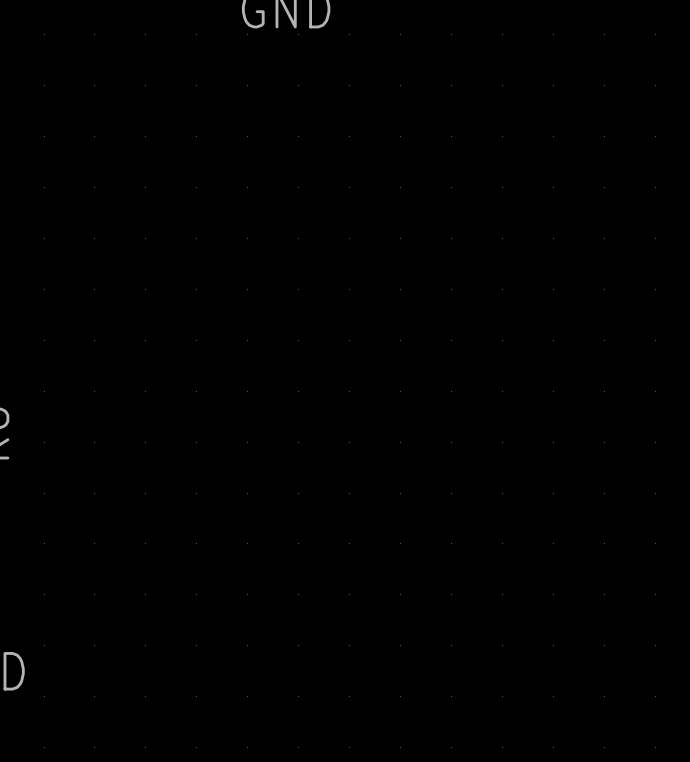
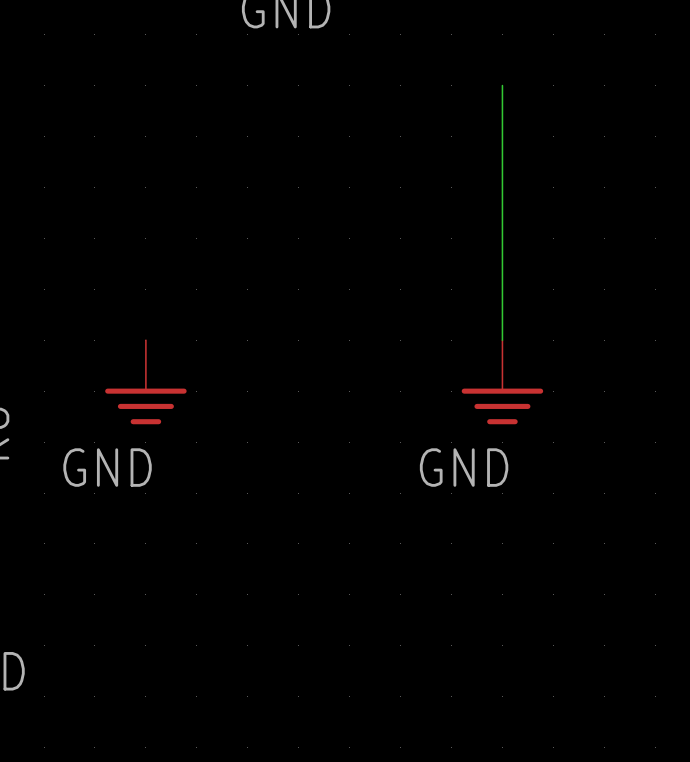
wire: none -> (502, 85) (502, 340)
power symbol: none -> GND (145, 382)
power symbol: none -> GND (502, 382)

